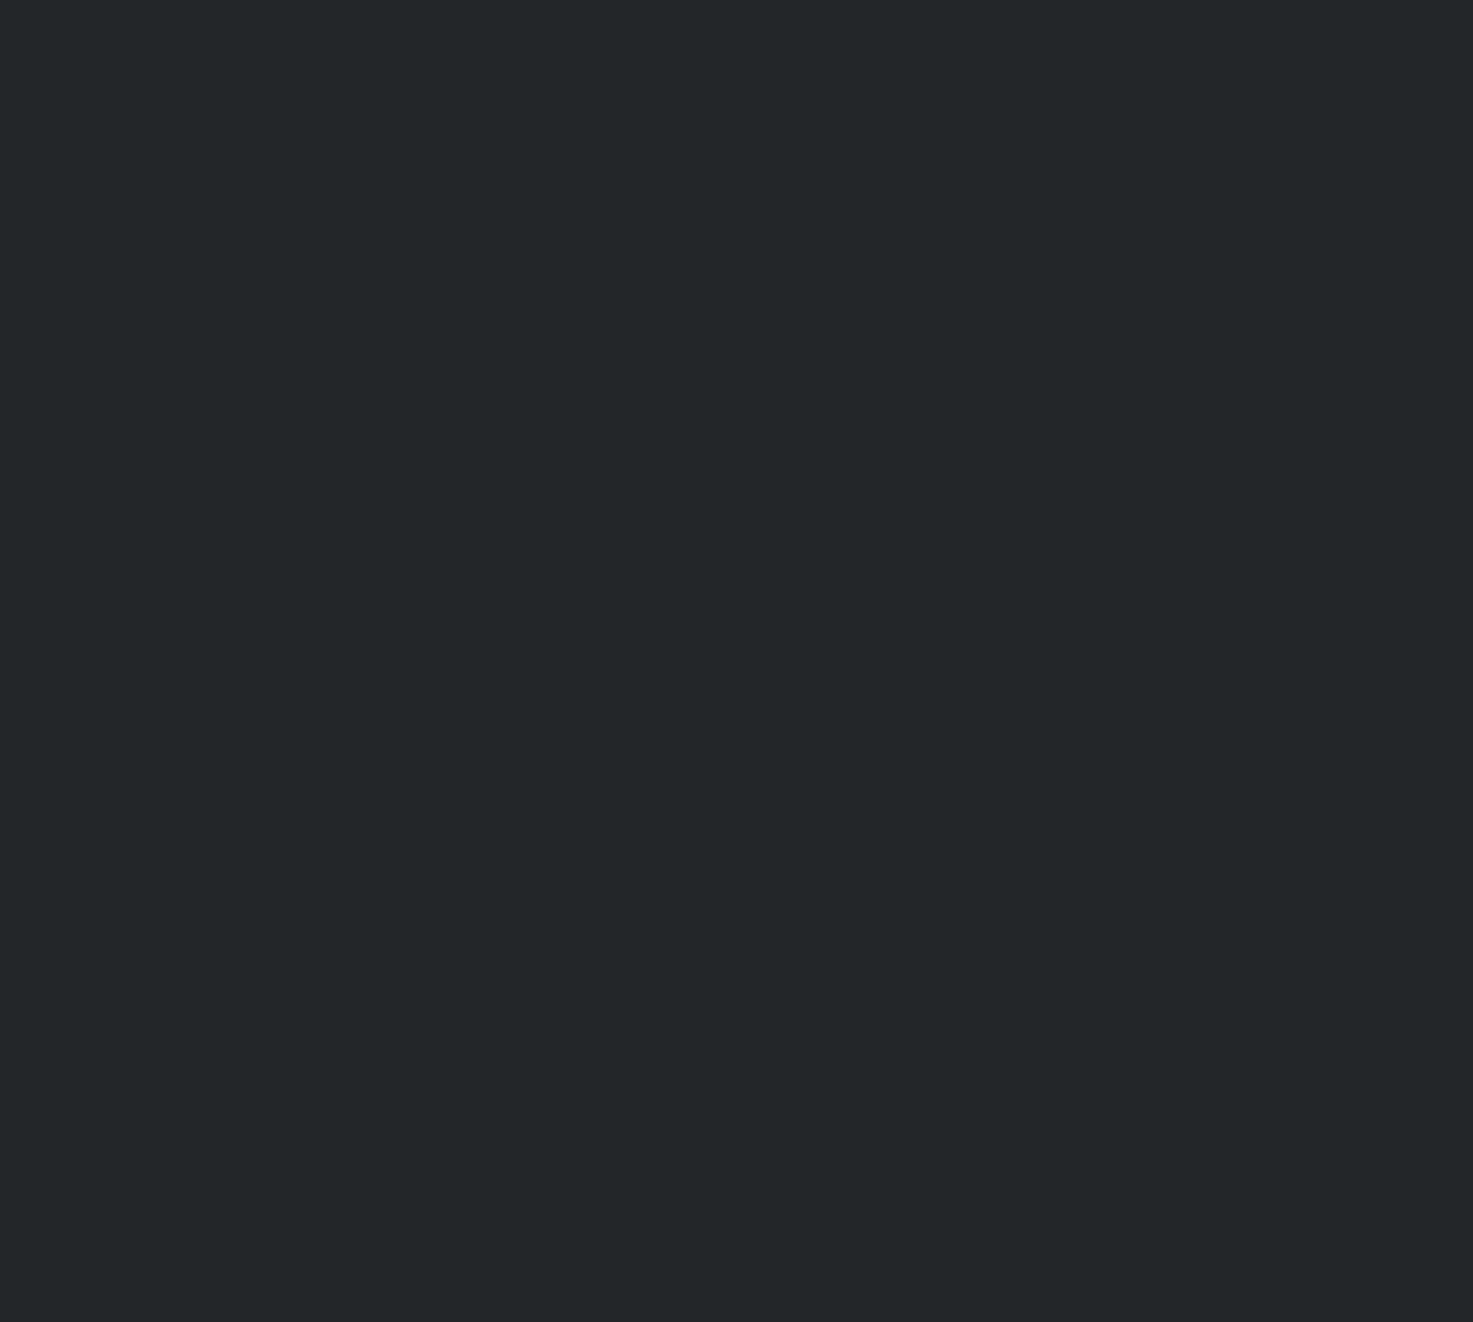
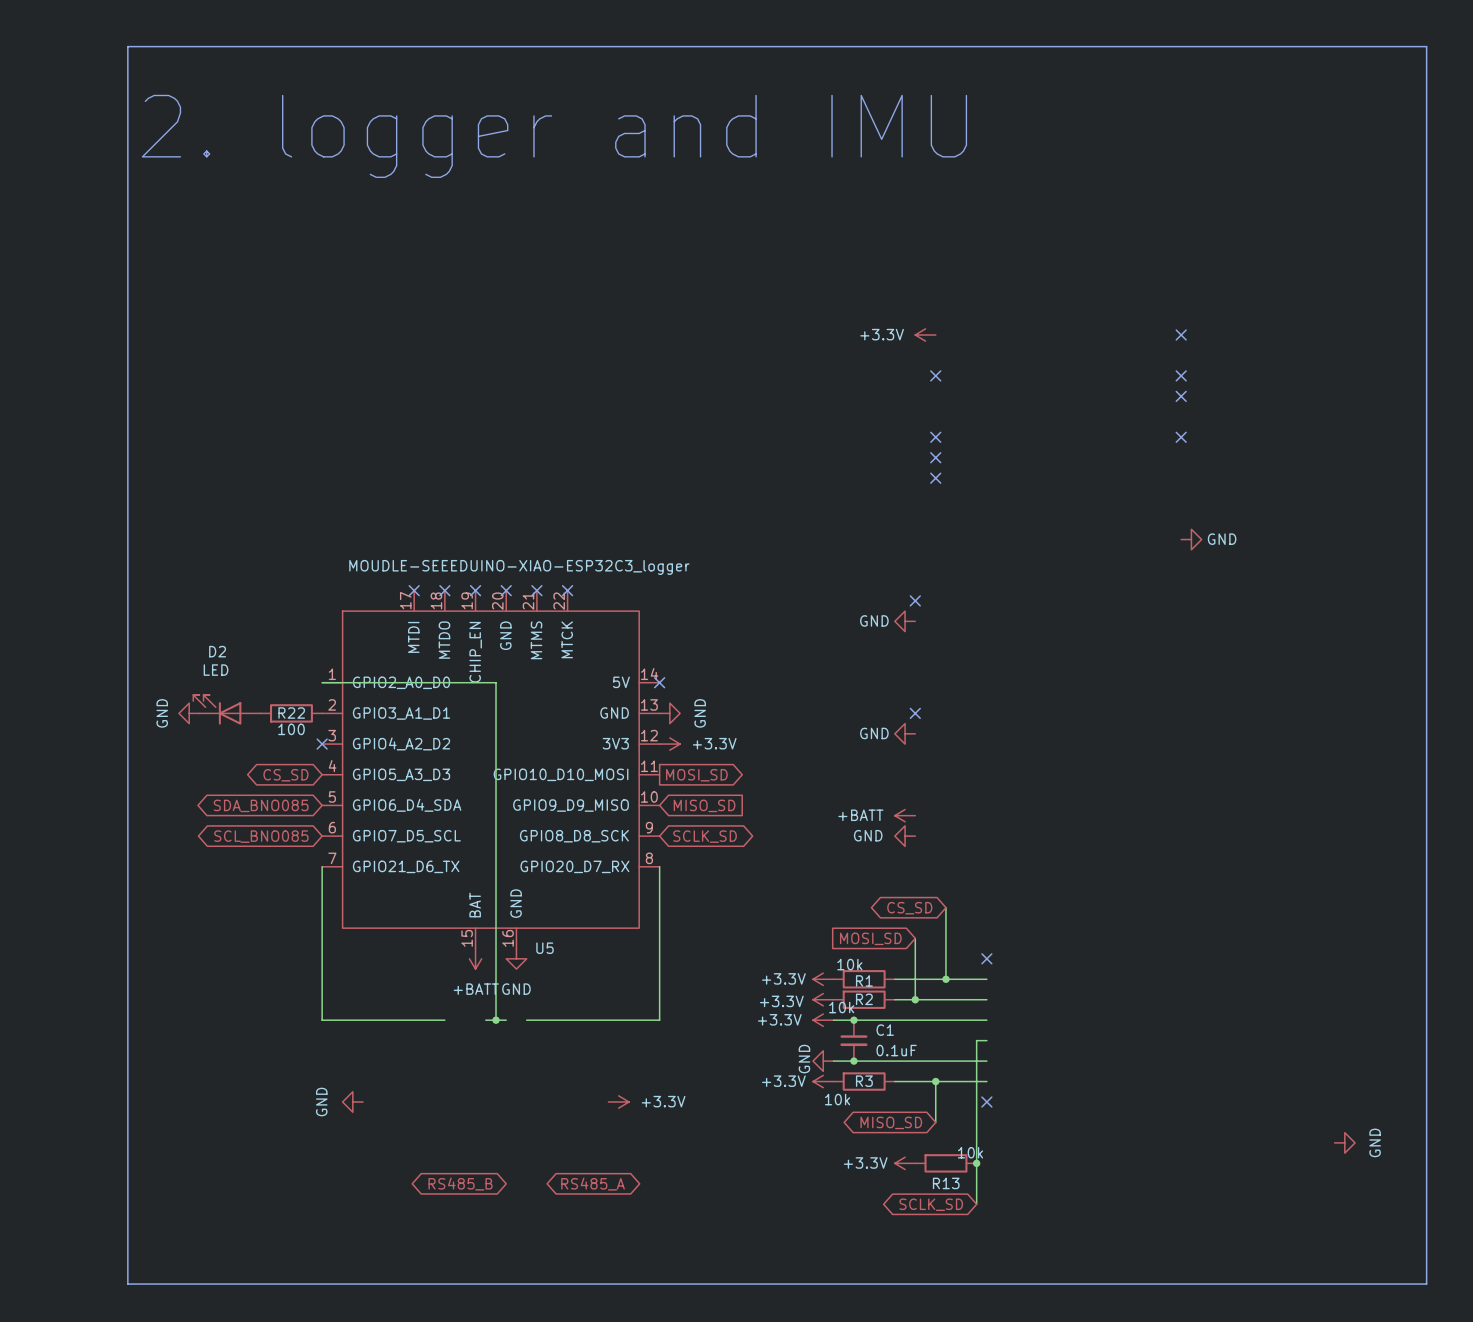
line: none -> (127, 46) (1426, 46) (1426, 1284) (127, 1284) (127, 46)
text: none -> 2. logger and IMU (554, 136)
power symbol: none -> +3.3V (925, 335)
no-connect mark: none -> (1181, 335)
no-connect mark: none -> (935, 375)
no-connect mark: none -> (1181, 375)
no-connect mark: none -> (1181, 396)
no-connect mark: none -> (935, 437)
no-connect mark: none -> (1181, 437)
no-connect mark: none -> (935, 457)
no-connect mark: none -> (935, 478)
power symbol: none -> GND (1191, 539)
no-connect mark: none -> (414, 590)
no-connect mark: none -> (444, 590)
no-connect mark: none -> (475, 590)
no-connect mark: none -> (506, 590)
no-connect mark: none -> (536, 590)
no-connect mark: none -> (567, 590)
no-connect mark: none -> (915, 600)
power symbol: none -> GND (905, 621)
wire: none -> (322, 682) (496, 682) (496, 1020)
no-connect mark: none -> (659, 682)
D2: none -> LED (227, 709)
power symbol: none -> GND (189, 713)
R22: none -> 100 (291, 713)
power symbol: none -> GND (669, 713)
no-connect mark: none -> (915, 713)
power symbol: none -> GND (905, 733)
no-connect mark: none -> (322, 744)
power symbol: none -> +3.3V (669, 744)
U5: none -> MOUDLE-SEEEDUINO-XIAO-ESP32C3_logger (490, 769)
global label: none -> CS_SD (285, 775)
global label: none -> MOSI_SD (696, 775)
global label: none -> SDA_BNO085 (261, 805)
global label: none -> MISO_SD (704, 805)
power symbol: none -> +BATT (905, 815)
global label: none -> SCL_BNO085 (261, 836)
global label: none -> SCLK_SD (705, 836)
power symbol: none -> GND (905, 836)
wire: none -> (322, 866) (322, 1020) (444, 1020)
wire: none -> (659, 866) (659, 1020) (526, 1020)
wire: none -> (945, 907) (945, 979)
global label: none -> CS_SD (909, 908)
global label: none -> MOSI_SD (870, 938)
wire: none -> (915, 938) (915, 999)
power symbol: none -> +BATT (475, 958)
power symbol: none -> GND (516, 958)
no-connect mark: none -> (986, 958)
power symbol: none -> +3.3V (823, 979)
R2: none -> 10k (864, 979)
wire: none -> (894, 979) (986, 979)
junction: none -> (945, 979)
power symbol: none -> +3.3V (823, 999)
R1: none -> 10k (864, 999)
wire: none -> (894, 999) (986, 999)
junction: none -> (915, 999)
wire: none -> (485, 1020) (506, 1020)
junction: none -> (496, 1020)
power symbol: none -> +3.3V (823, 1020)
wire: none -> (833, 1020) (986, 1020)
junction: none -> (853, 1020)
C1: none -> 0.1uF (853, 1040)
wire: none -> (986, 1040) (976, 1040) (976, 1204)
power symbol: none -> GND (823, 1061)
wire: none -> (833, 1061) (986, 1061)
junction: none -> (853, 1061)
power symbol: none -> +3.3V (823, 1081)
R3: none -> 10k (864, 1081)
wire: none -> (894, 1081) (986, 1081)
wire: none -> (935, 1081) (935, 1122)
junction: none -> (935, 1081)
power symbol: none -> GND (352, 1102)
power symbol: none -> +3.3V (618, 1102)
no-connect mark: none -> (986, 1102)
global label: none -> MISO_SD (891, 1122)
power symbol: none -> GND (1344, 1142)
power symbol: none -> +3.3V (905, 1163)
R13: none -> 10k (945, 1163)
junction: none -> (976, 1163)
global label: none -> RS485_B (460, 1184)
global label: none -> RS485_A (593, 1184)
global label: none -> SCLK_SD (931, 1204)

